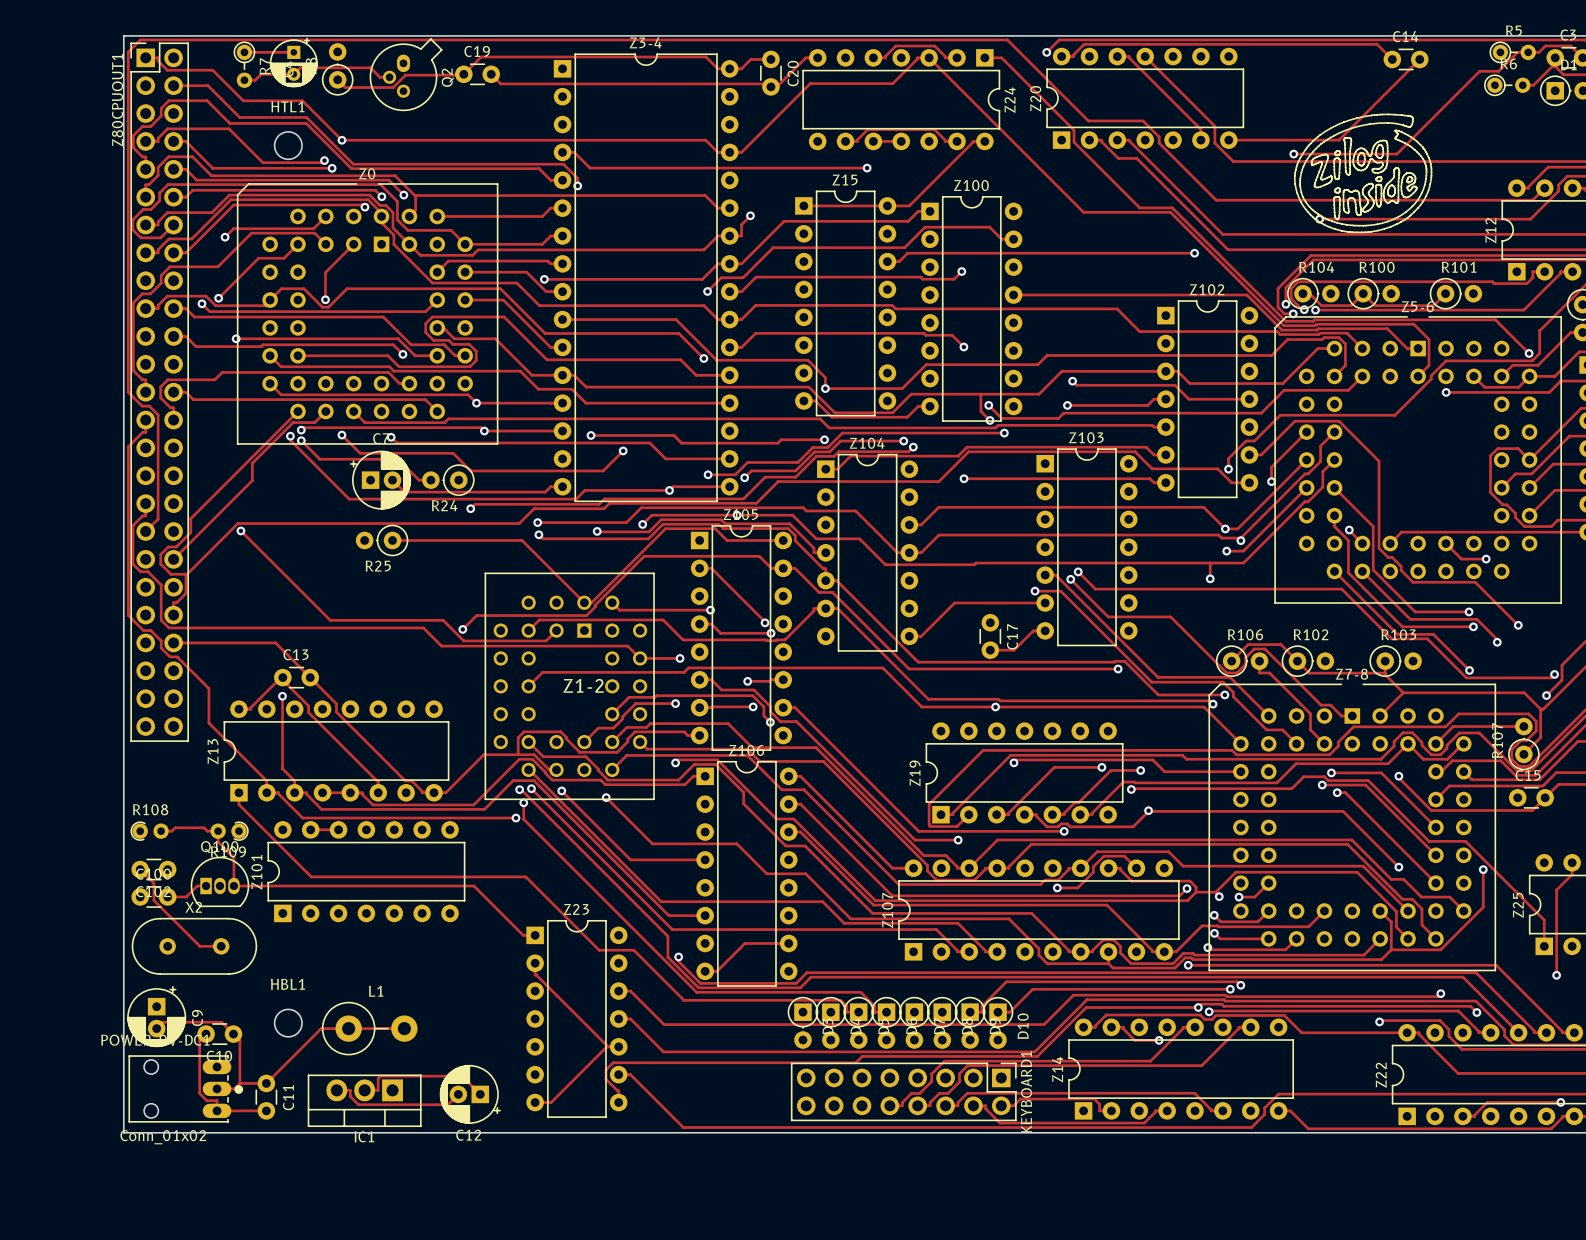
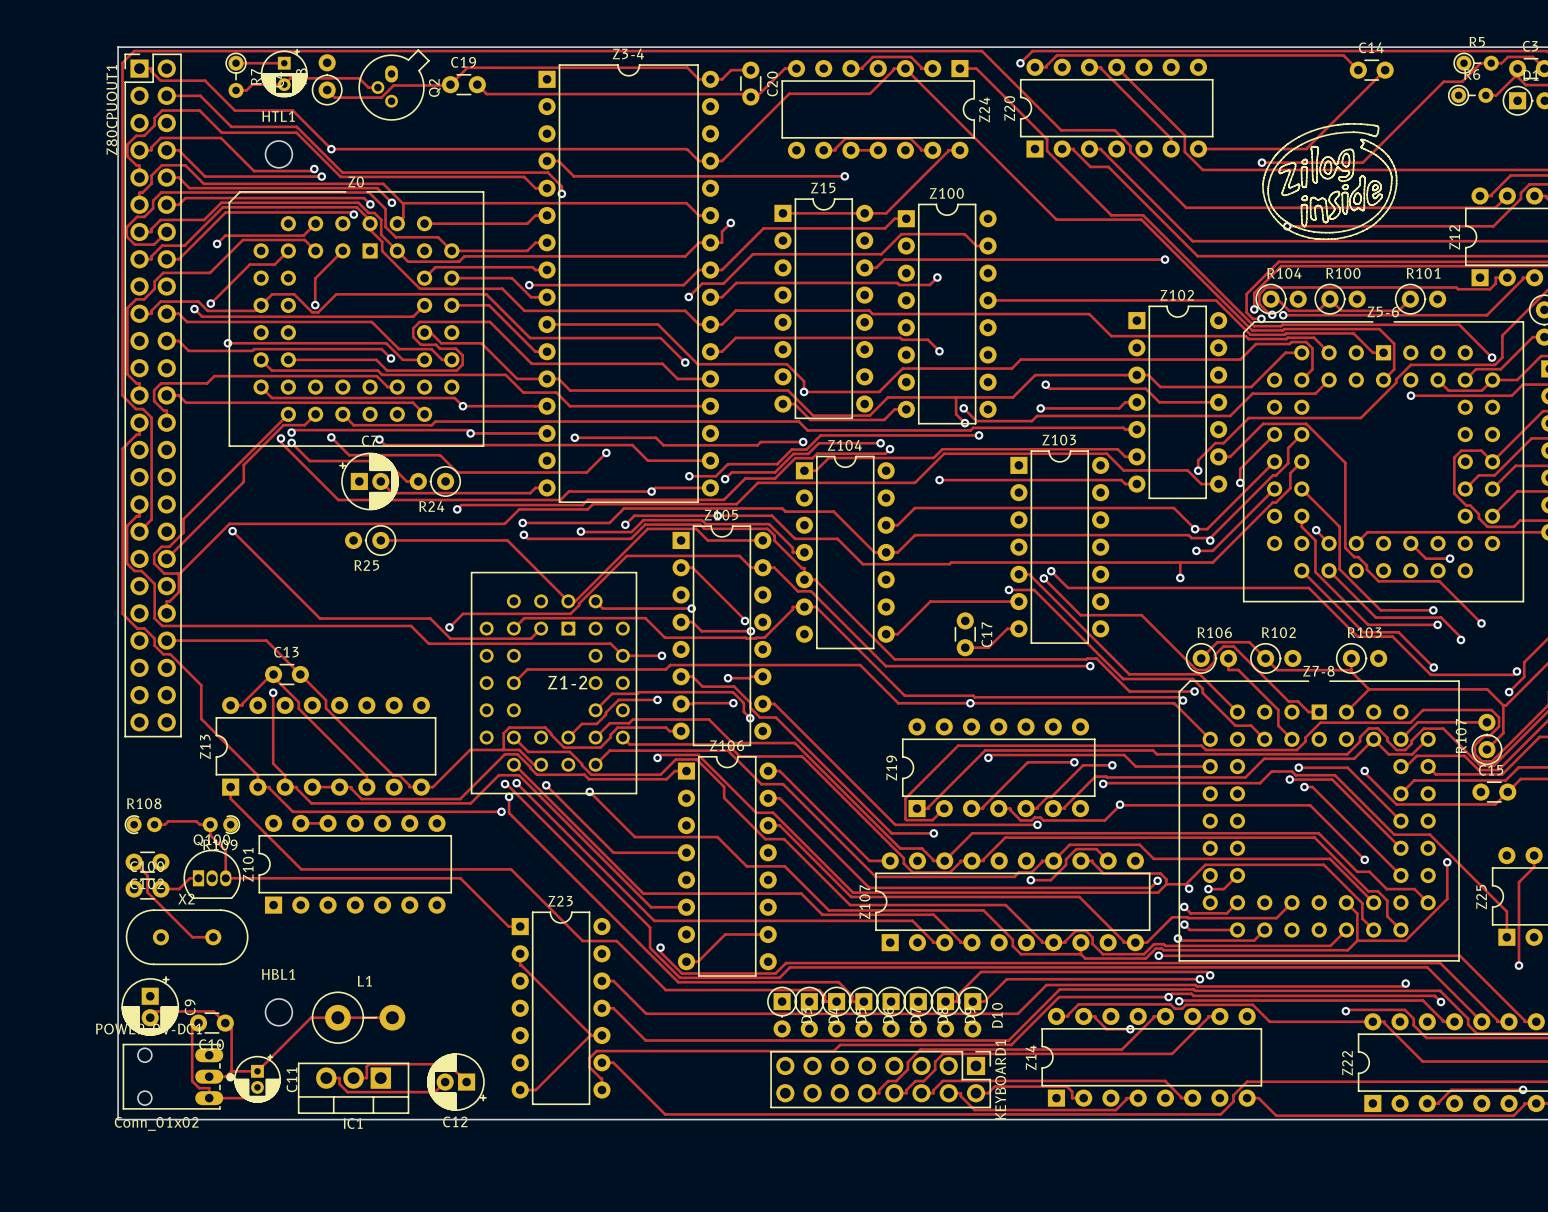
C11 footprint: [255, 1074, 278, 1120] -> [234, 1054, 281, 1103]

